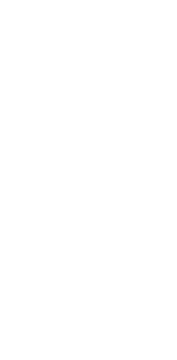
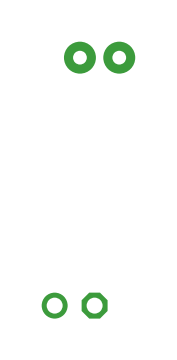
part: none -> (99, 57)
part: none -> (74, 305)

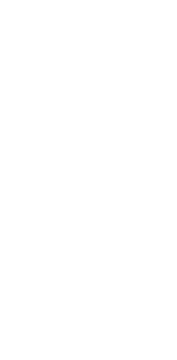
part: (99, 57) -> none
part: (74, 305) -> none

